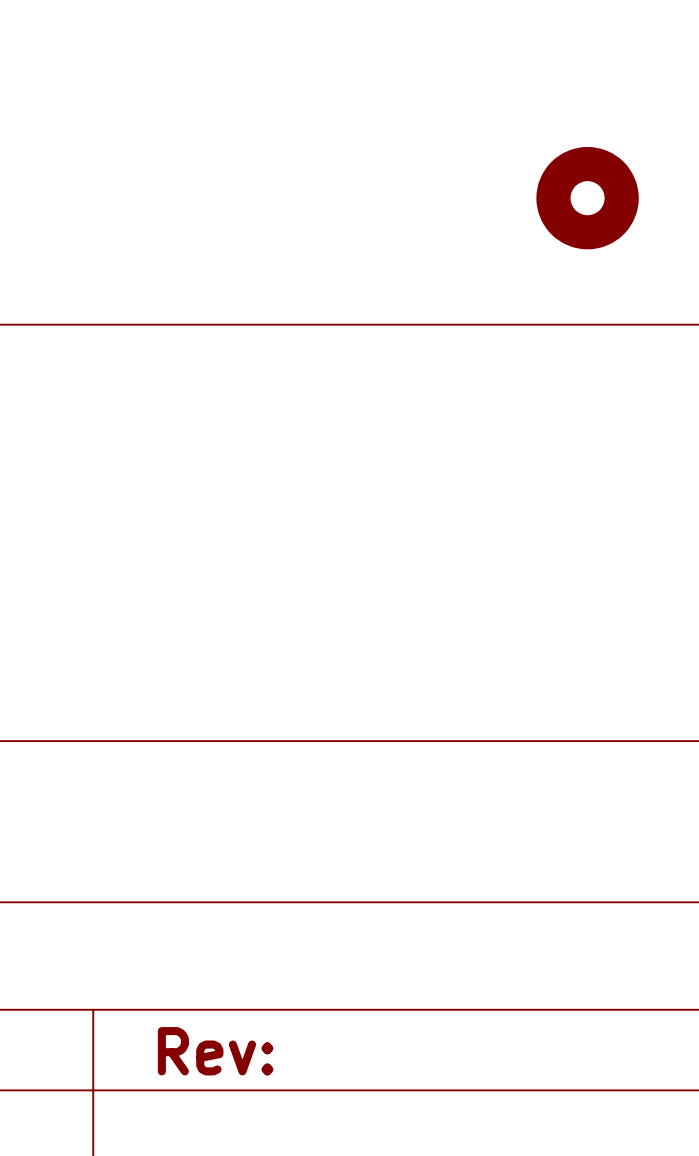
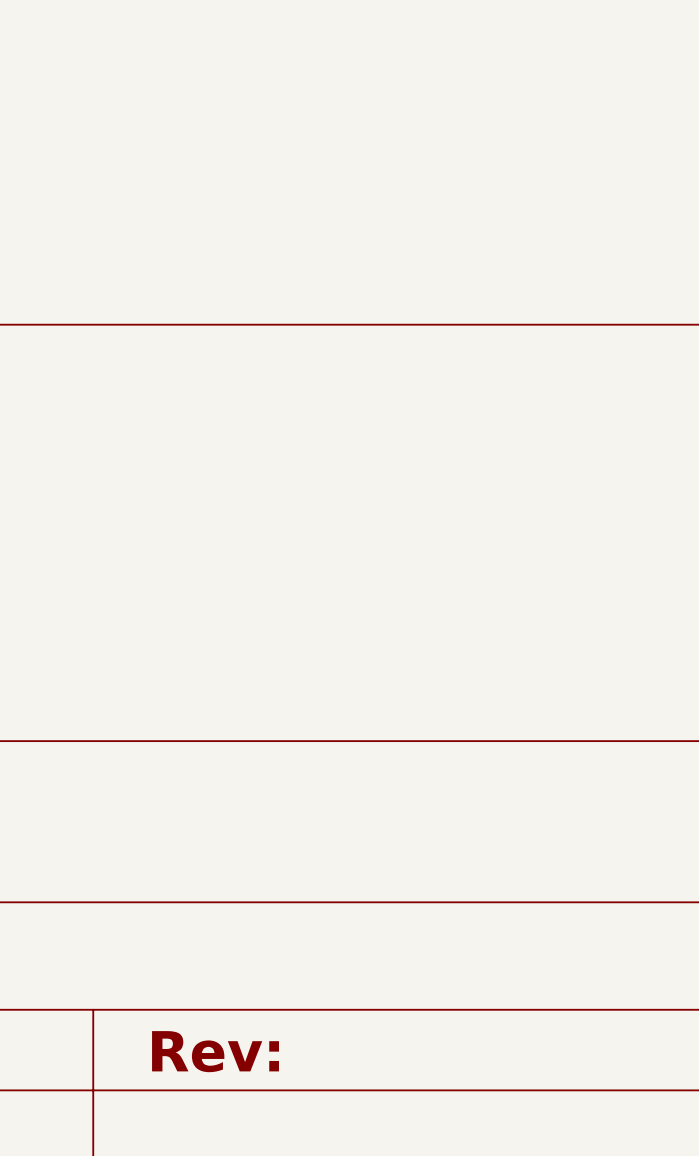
part: (587, 198) -> none

